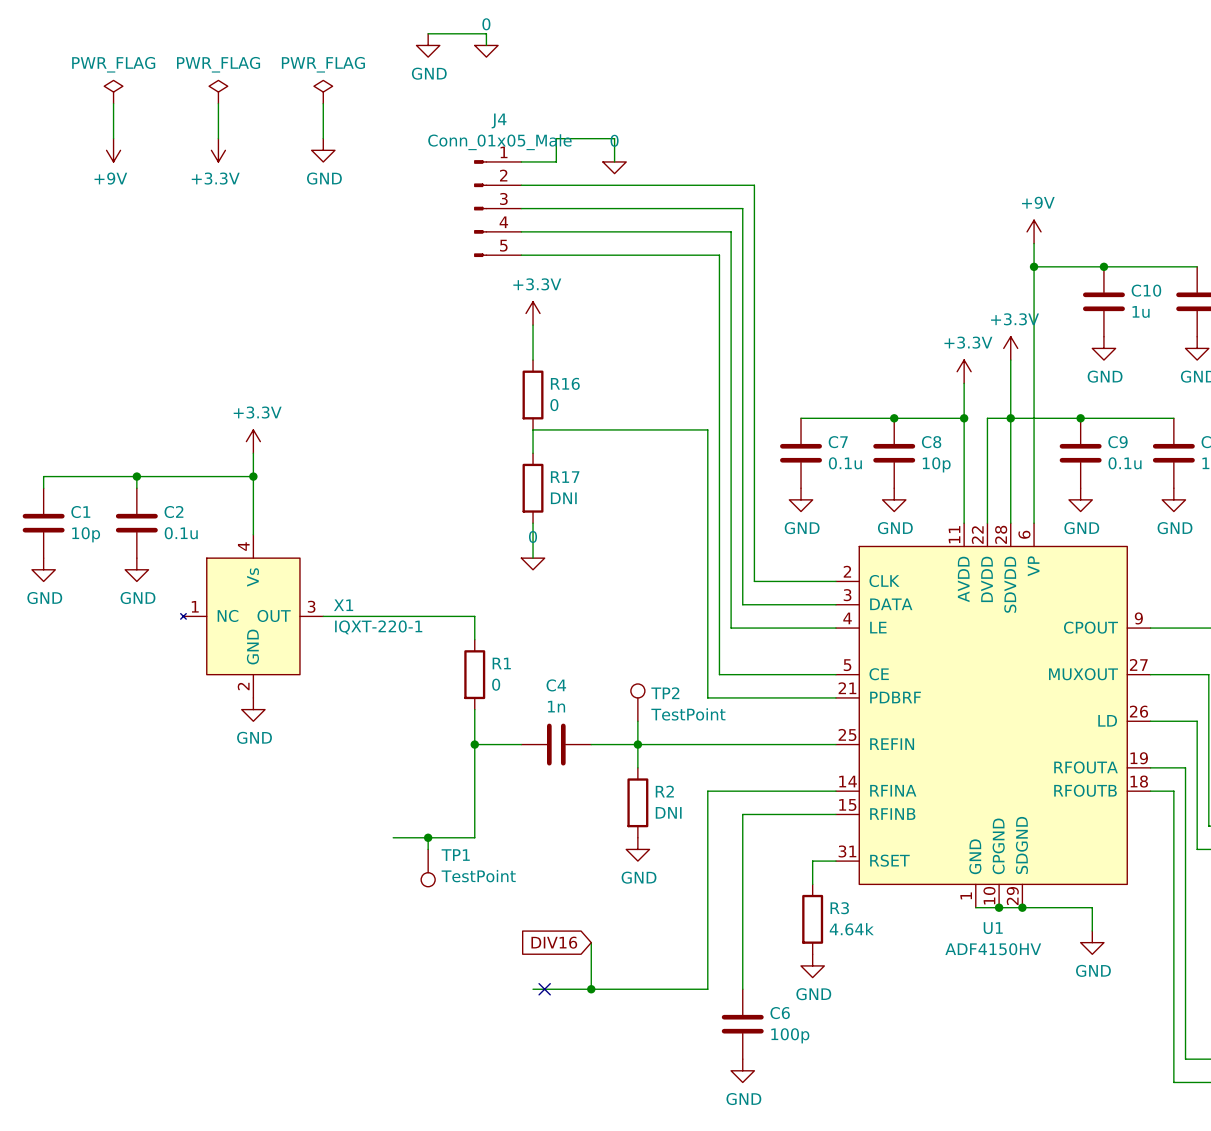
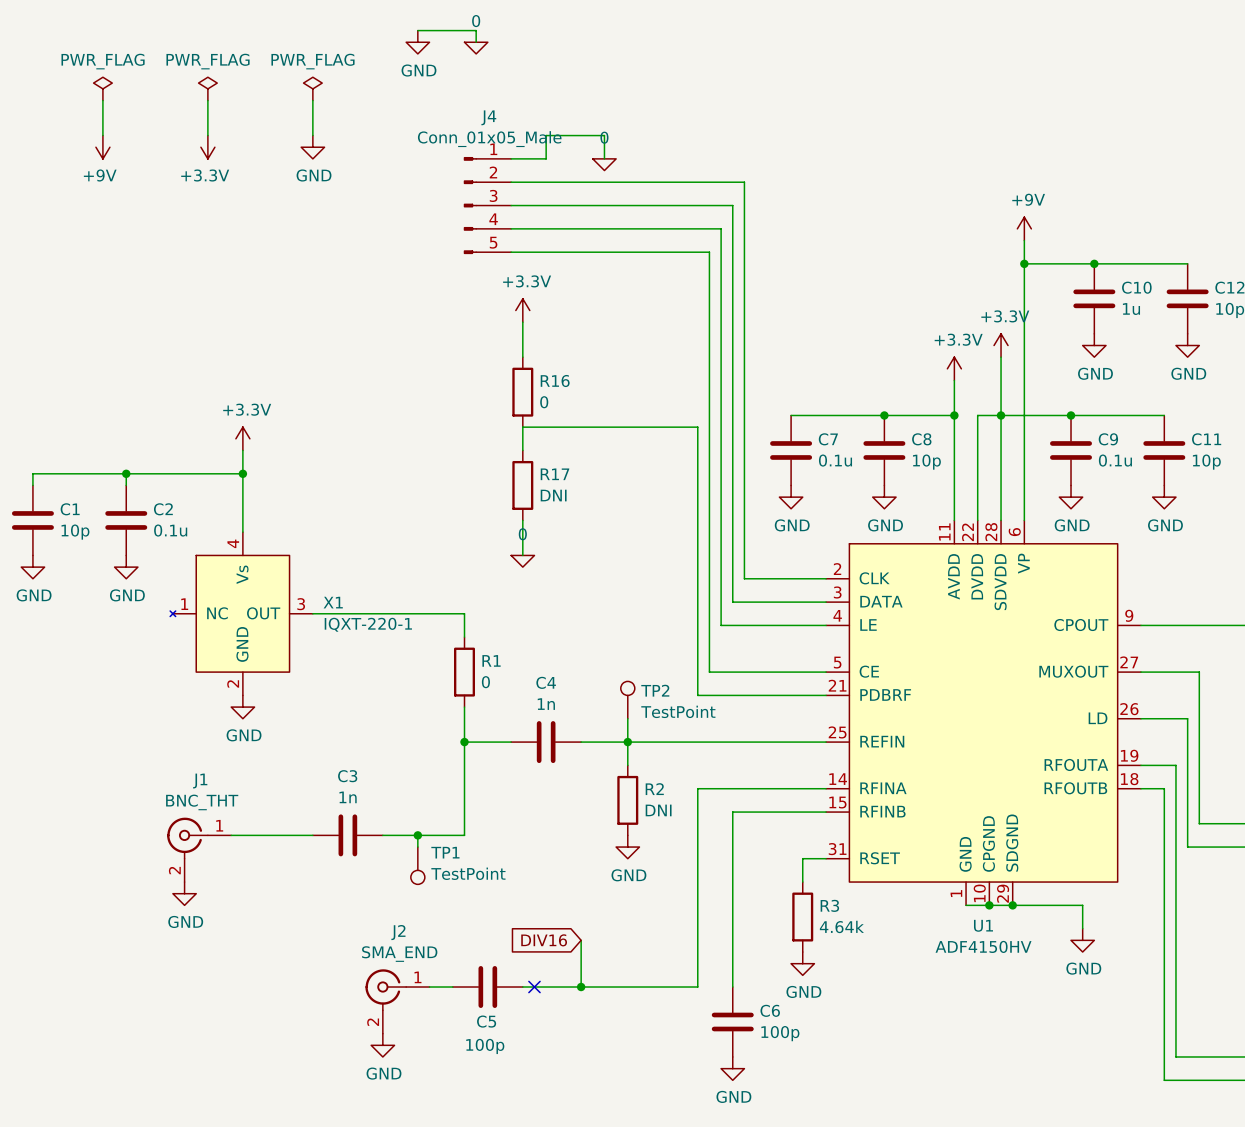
wire: none -> (231, 835) (312, 835)
C3: none -> 1n (347, 835)
J1: none -> BNC_THT (199, 849)
power symbol: none -> GND (184, 893)
wire: none -> (429, 987) (452, 987)
C5: none -> 100p (487, 987)
J2: none -> SMA_END (397, 1001)
power symbol: none -> GND (382, 1045)

